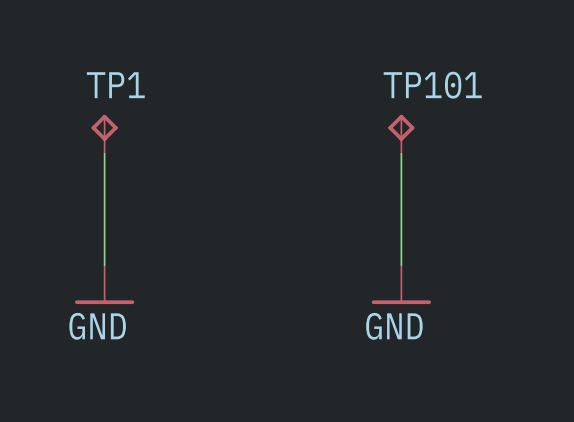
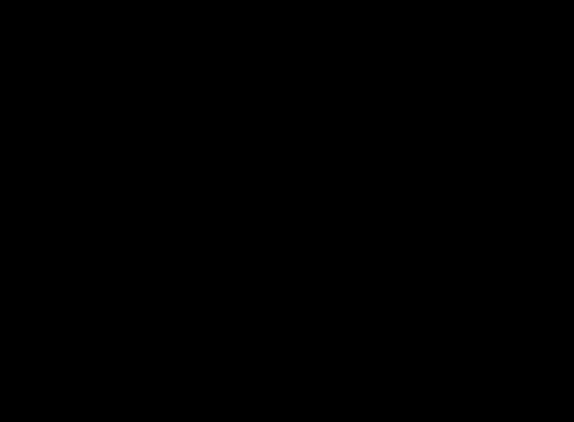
TP1: (104, 134) -> none
TP101: (401, 134) -> none
wire: (104, 153) (104, 265) -> none
wire: (401, 153) (401, 265) -> none
power symbol: GND (104, 284) -> none
power symbol: GND (401, 284) -> none

